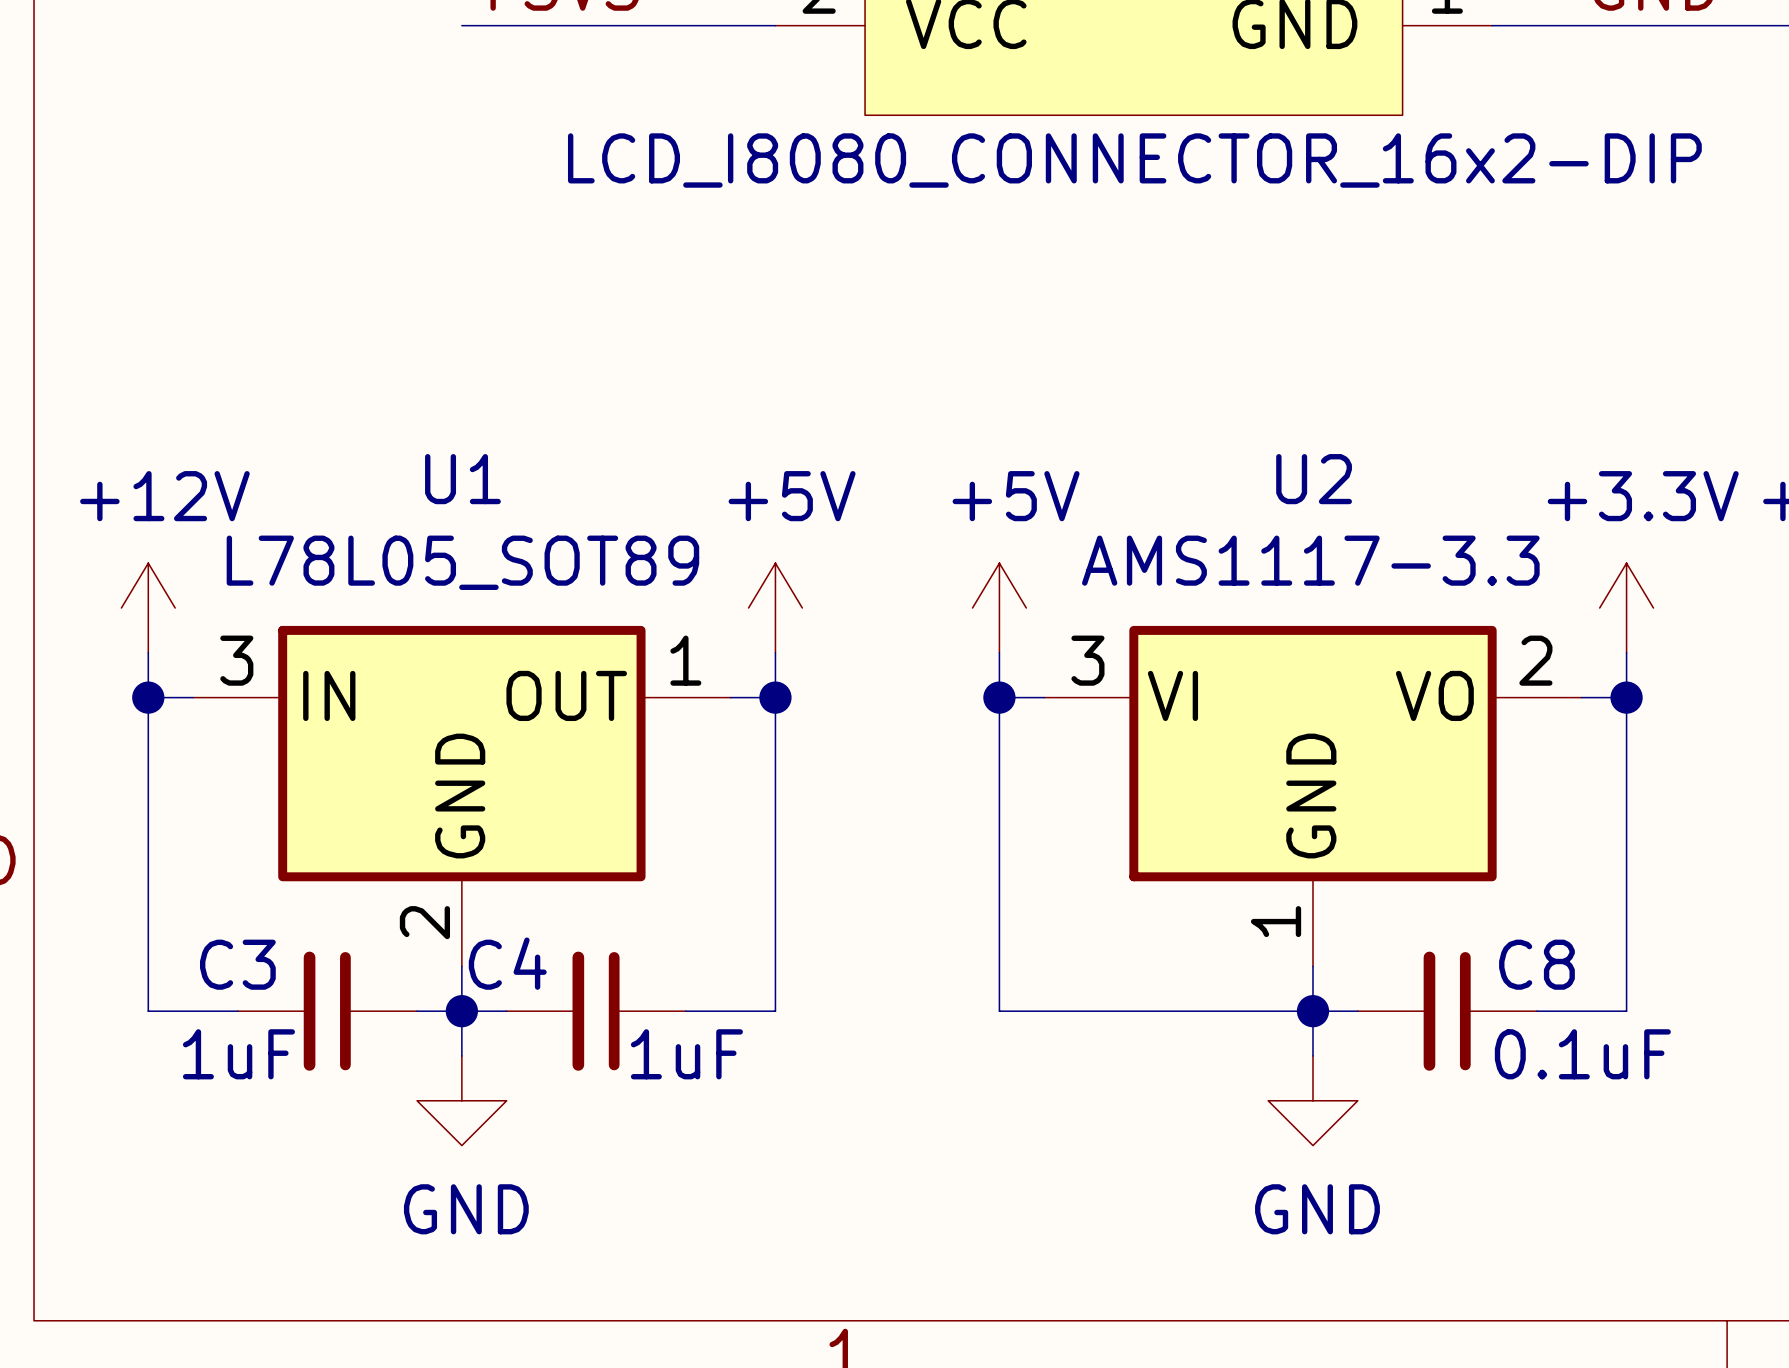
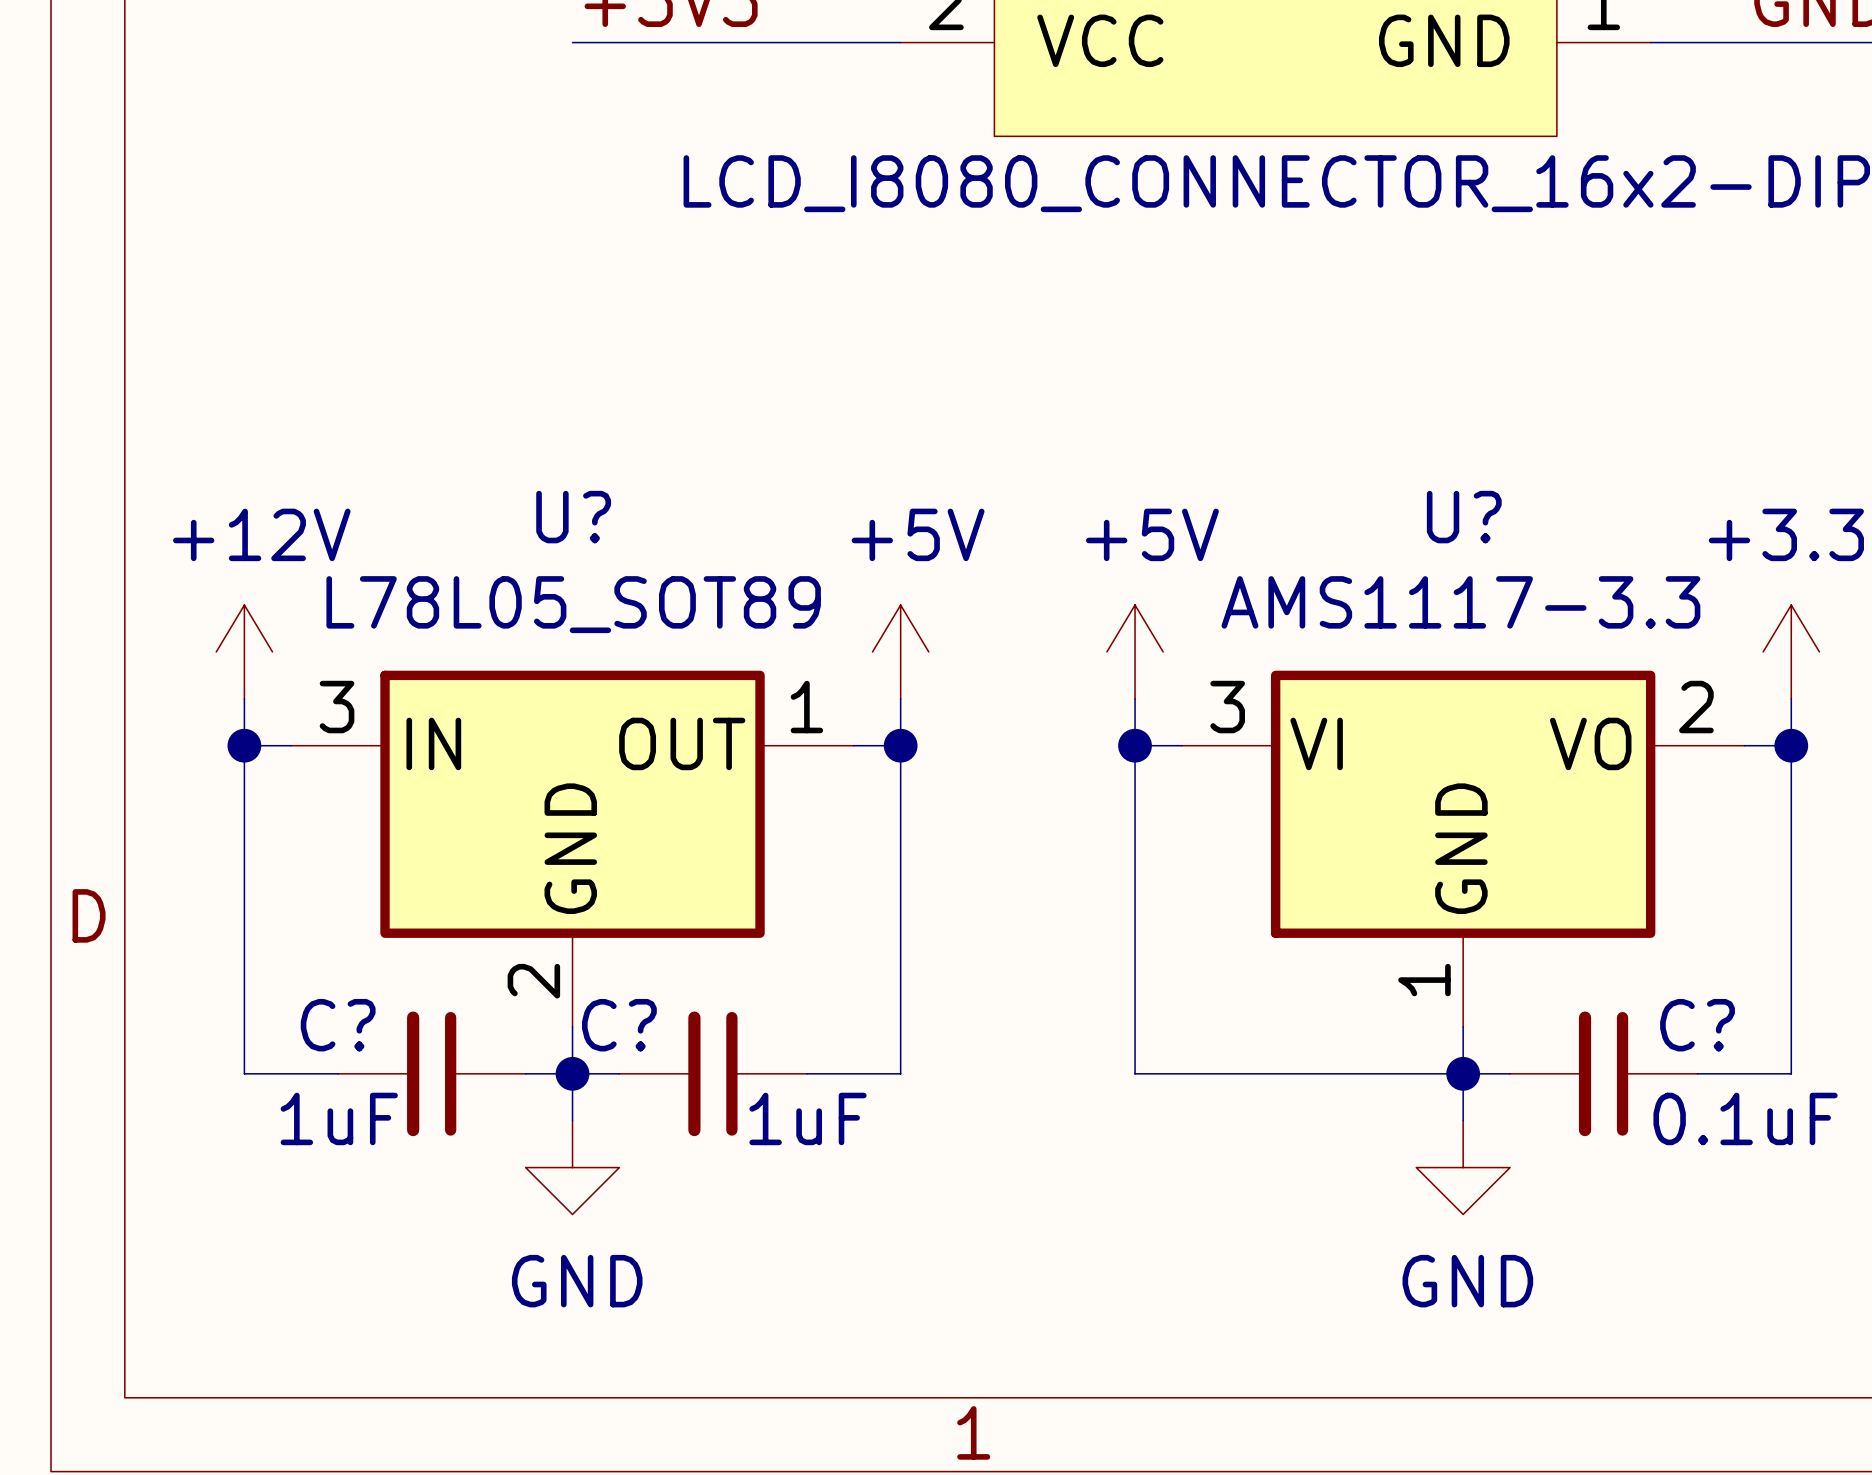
U1 name: U1 (462, 479) -> U? (573, 517)
U2 name: U2 (1314, 479) -> U? (1464, 517)
C4 name: C4 (507, 963) -> C? (619, 1025)
C3 name: C3 (237, 964) -> C? (338, 1025)
C8 name: C8 (1536, 964) -> C? (1697, 1025)

